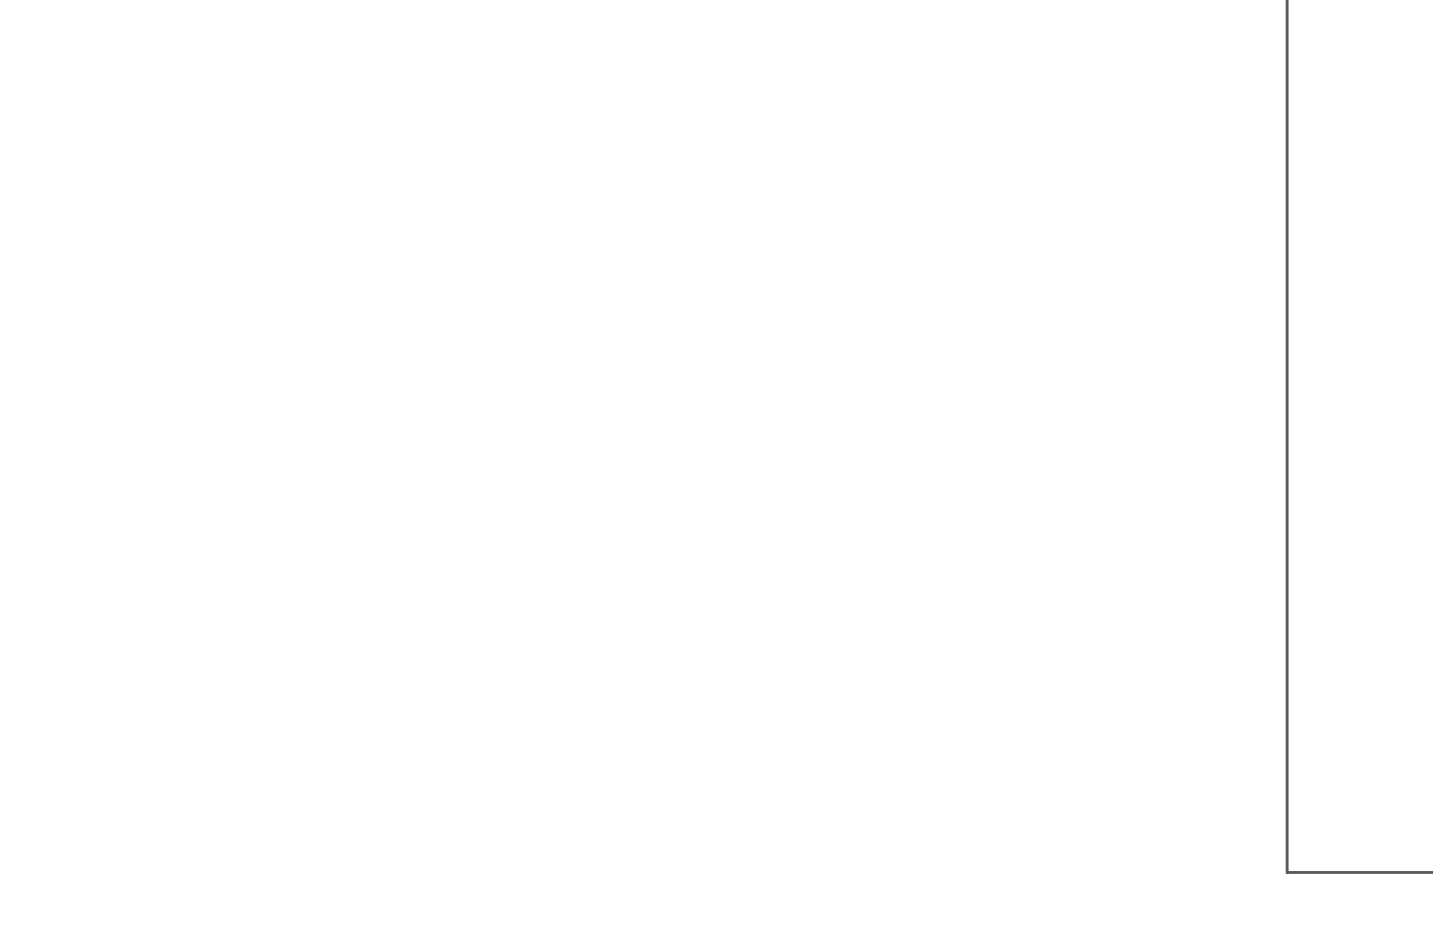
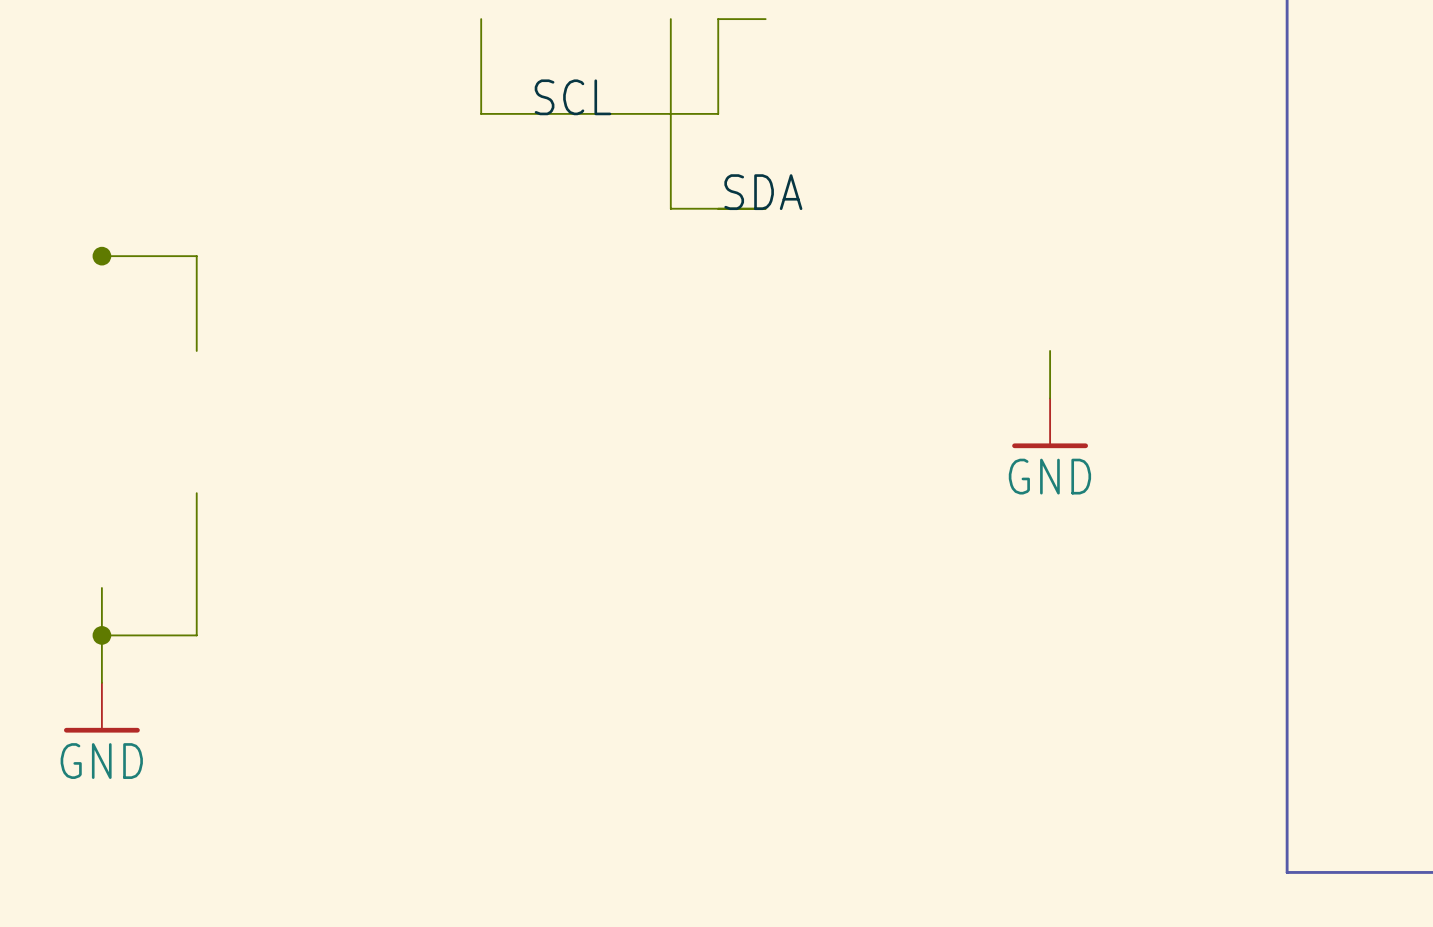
wire: none -> (481, 19) (481, 113) (718, 113) (718, 19) (765, 19)
wire: none -> (670, 19) (670, 208) (765, 208)
label: none -> SCL (573, 97)
label: none -> SDA (763, 192)
wire: none -> (101, 256) (196, 256) (196, 350)
junction: none -> (101, 256)
wire: none -> (1050, 350) (1050, 398)
power symbol: none -> GND (1050, 423)
wire: none -> (196, 493) (196, 635) (101, 635)
wire: none -> (101, 588) (101, 682)
junction: none -> (101, 635)
power symbol: none -> GND (101, 707)

